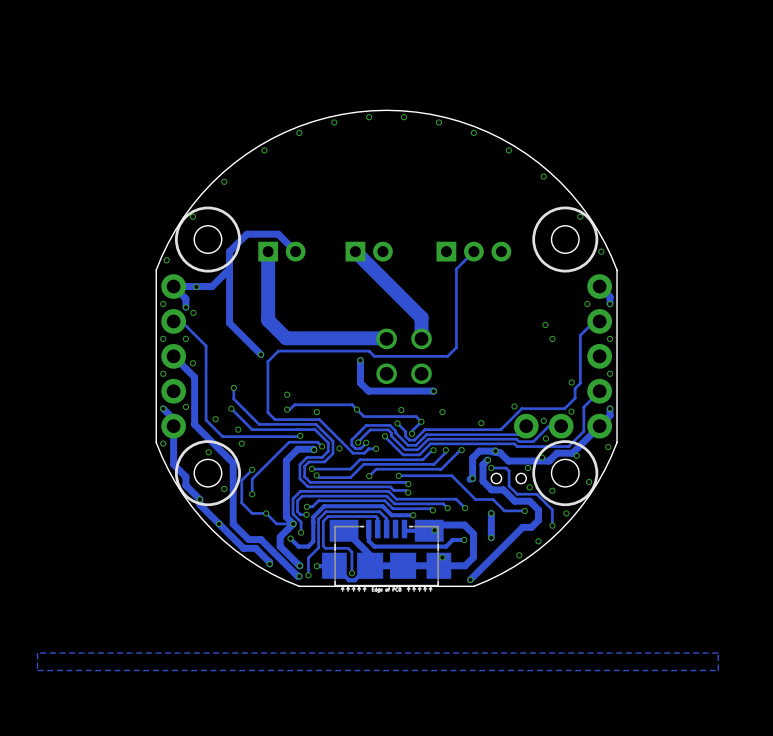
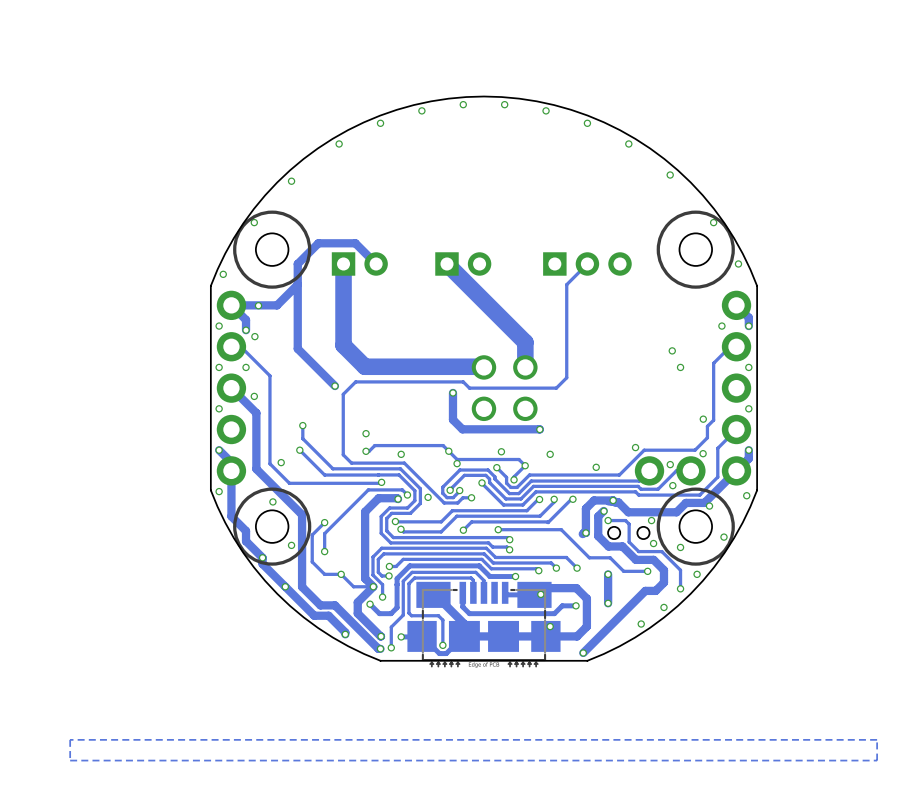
via: (185, 406) -> none
via: none -> (457, 463)
via: (238, 429) -> none
via: (241, 443) -> none
via: (541, 457) -> none

